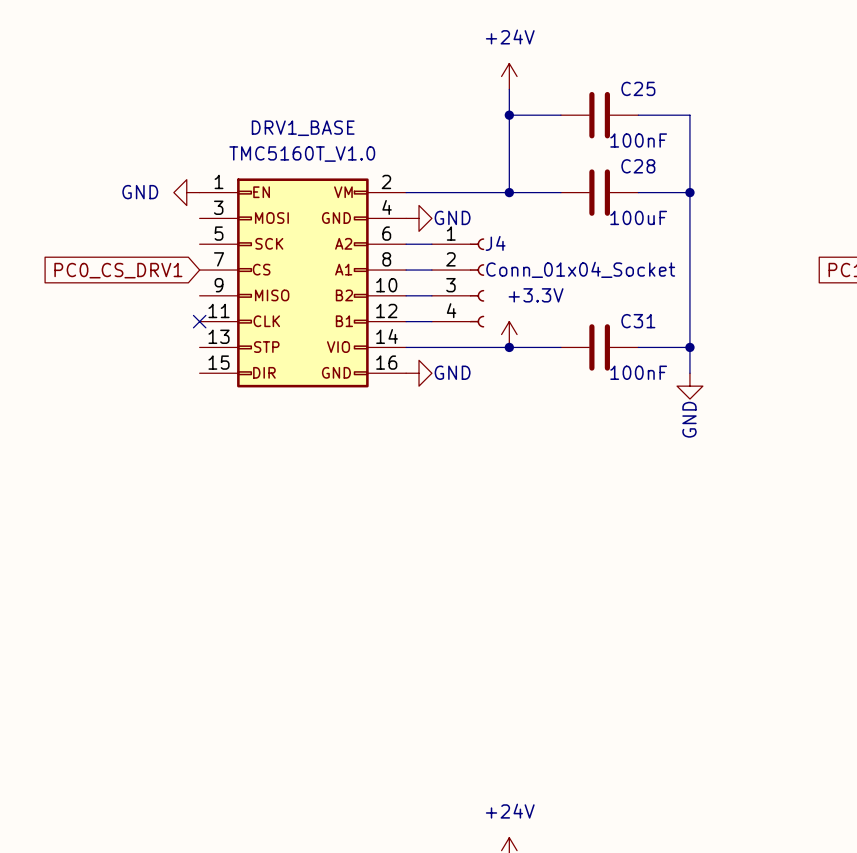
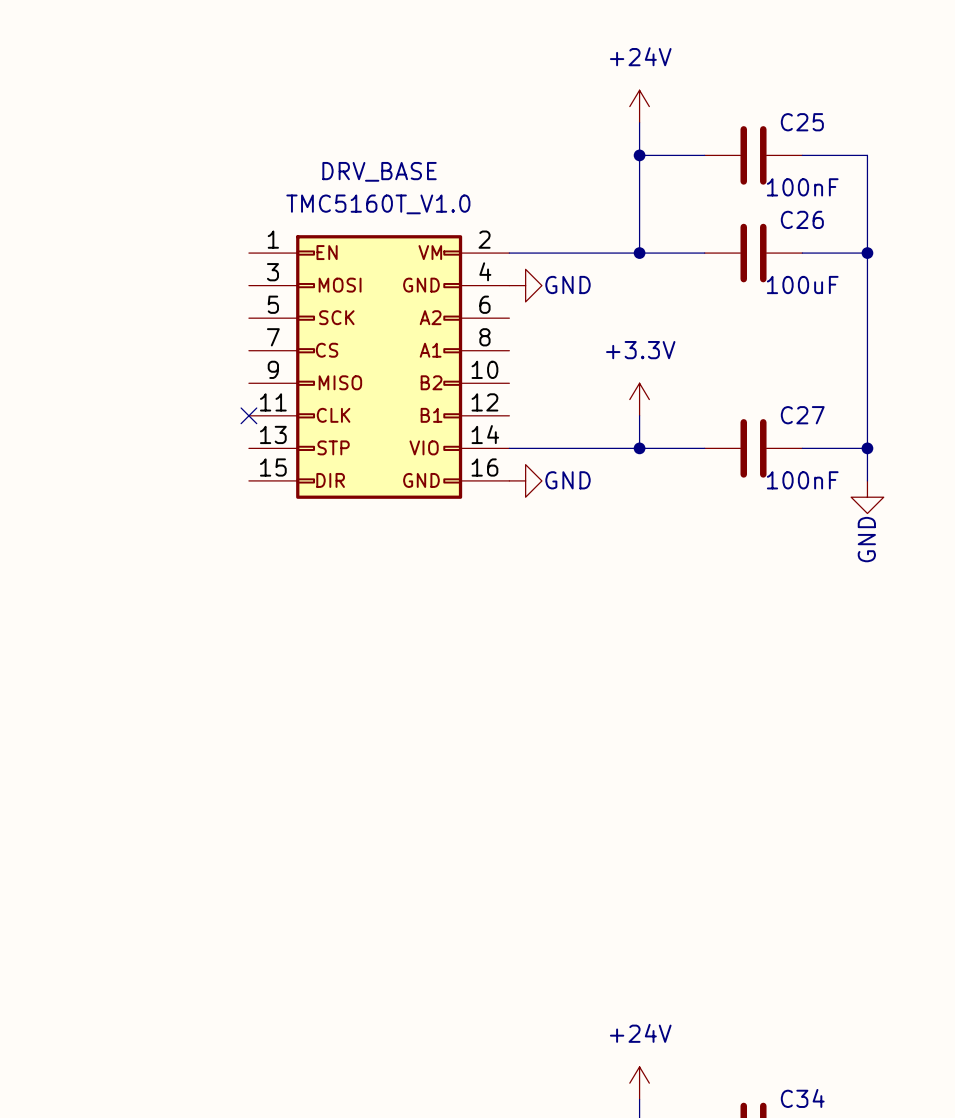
DRV1_BASE name: DRV1_BASE (303, 128) -> DRV_BASE (379, 171)
C28 name: C28 (638, 166) -> C26 (802, 219)
power symbol: GND (186, 192) -> none
wire: (406, 244) (431, 244) -> none
global label: PC0_CS_DRV1 (118, 270) -> none
wire: (406, 270) (431, 270) -> none
J4: Conn_01x04_Socket (458, 282) -> none
wire: (406, 295) (431, 295) -> none
power symbol text position: +3.3V (536, 295) -> +3.3V (640, 350)
wire: (406, 321) (431, 321) -> none
C31 name: C31 (638, 321) -> C27 (802, 415)
power symbol position: +3.3V (509, 334) -> +3.3V (639, 399)

